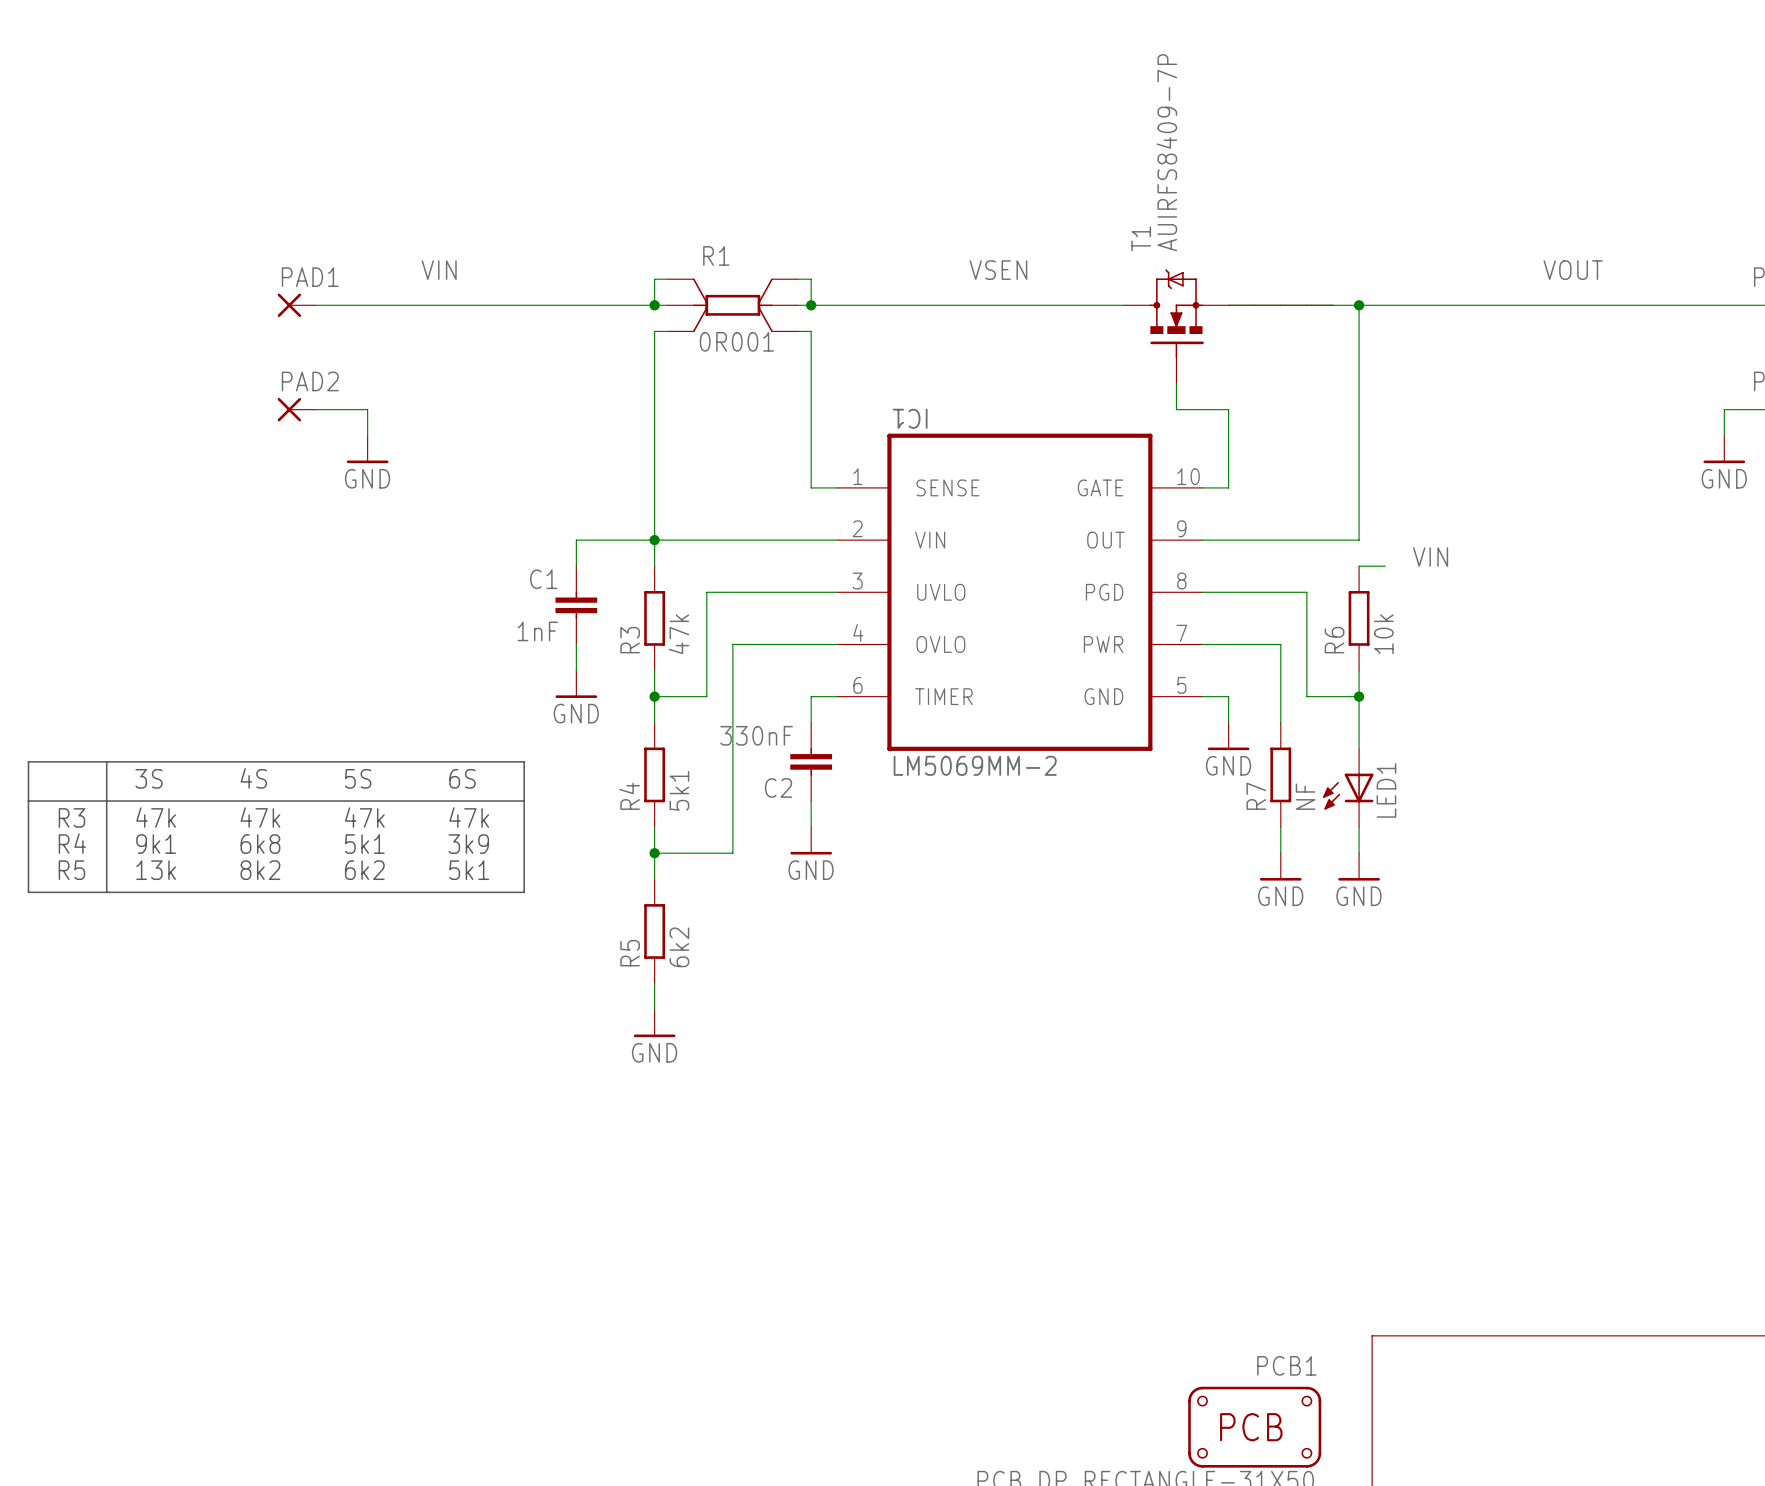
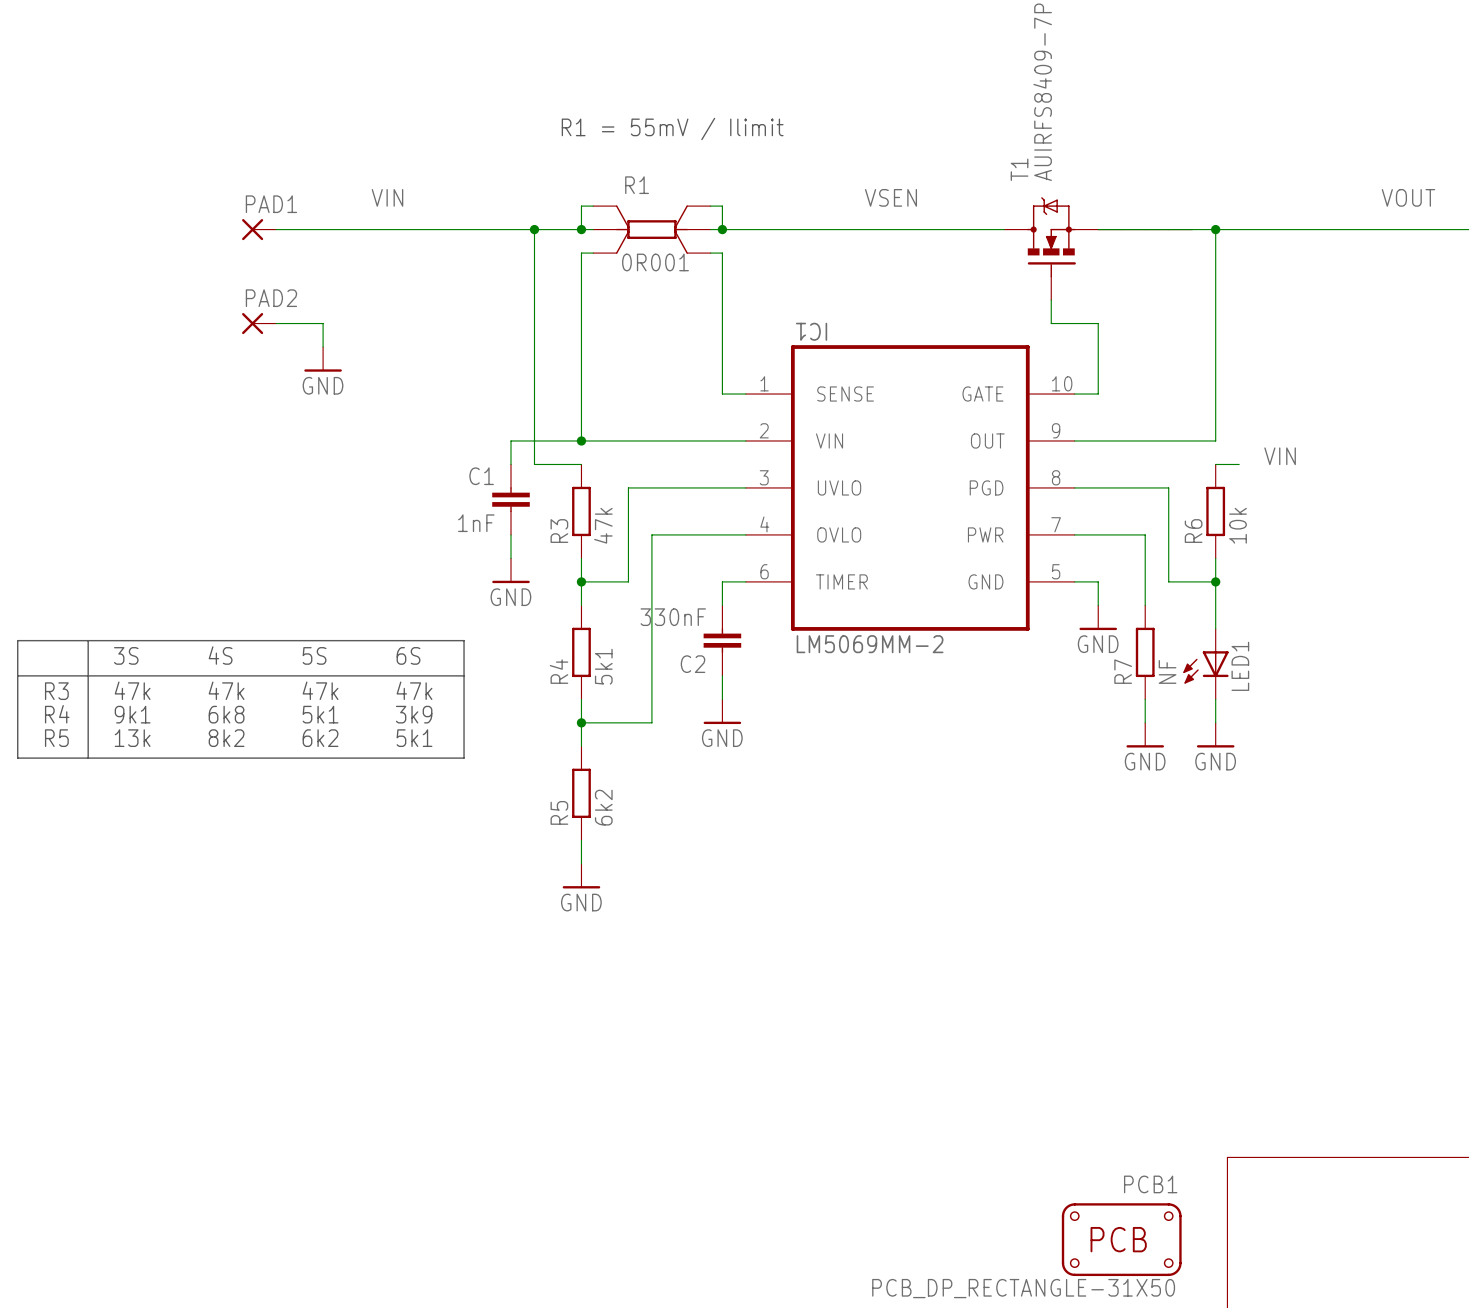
text: none -> R1 = 55mV / Ilimit (672, 128)
junction: none -> (534, 229)
wire: (654, 540) (654, 566) -> (534, 229) (534, 464) (581, 464)

